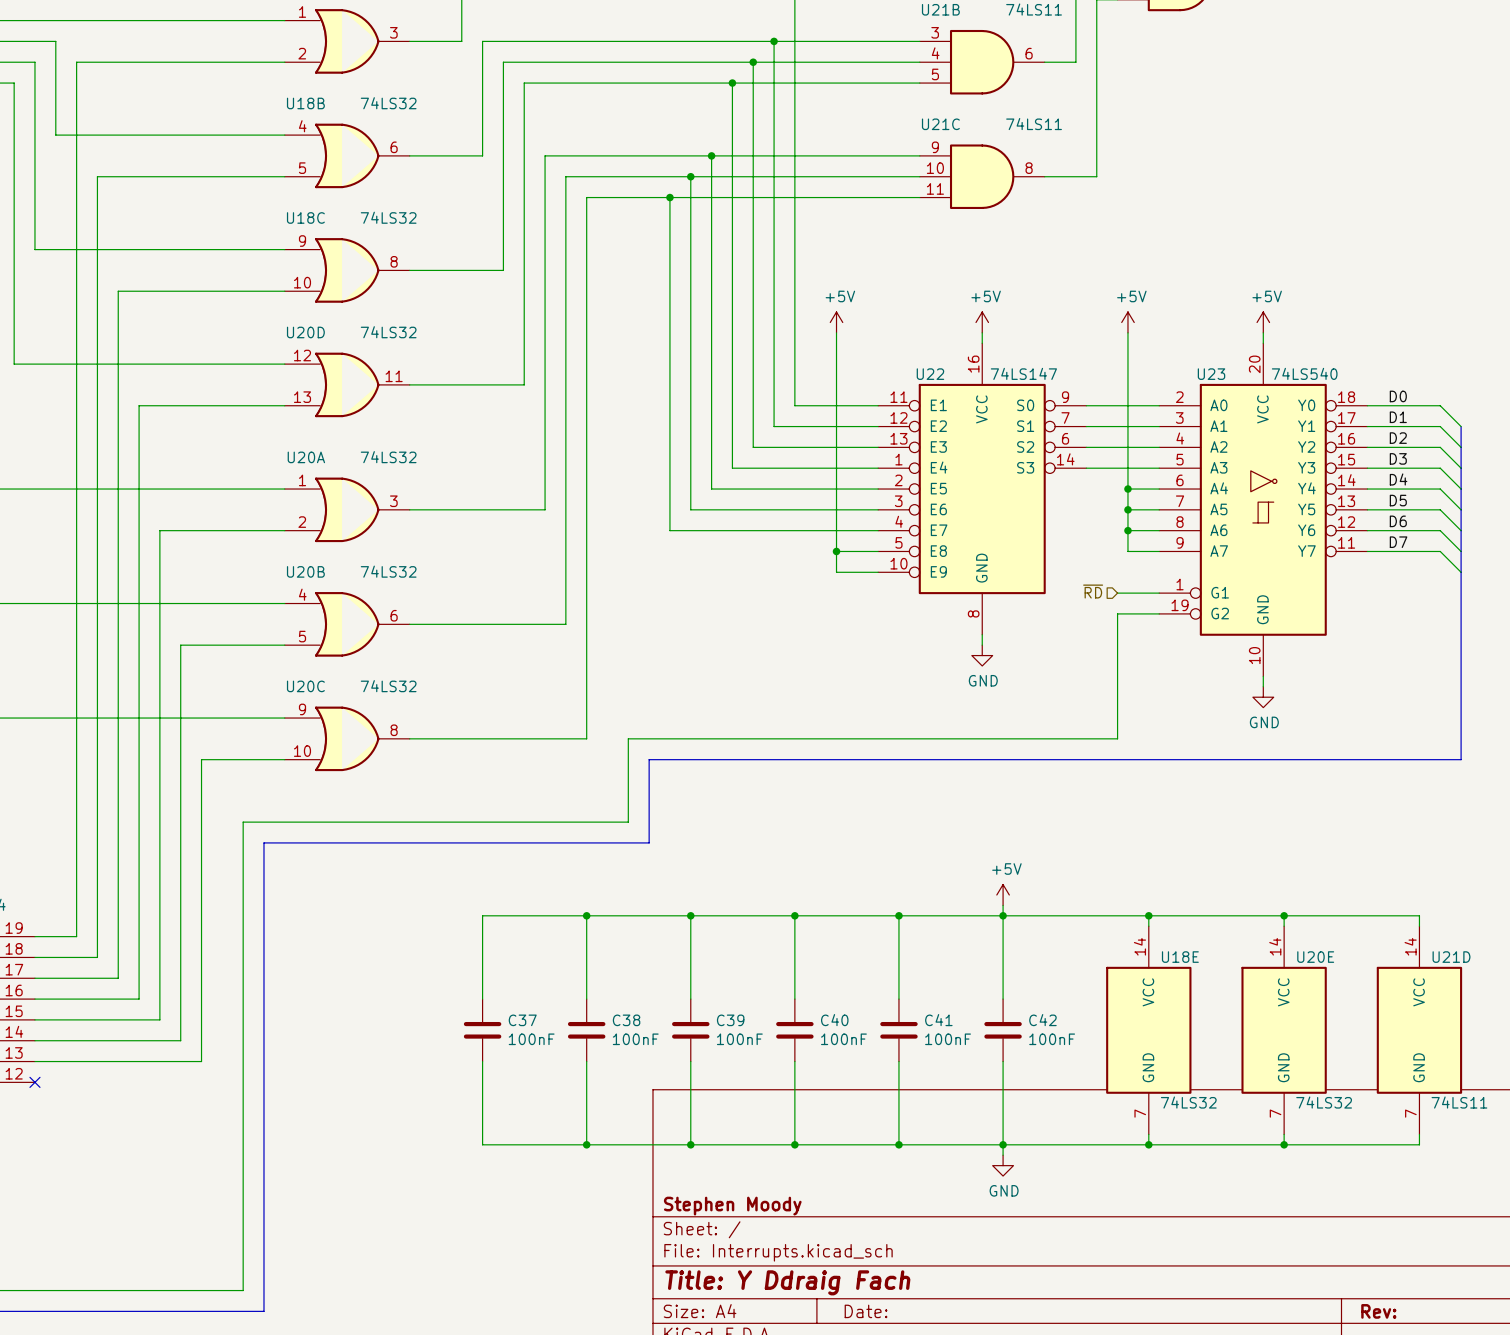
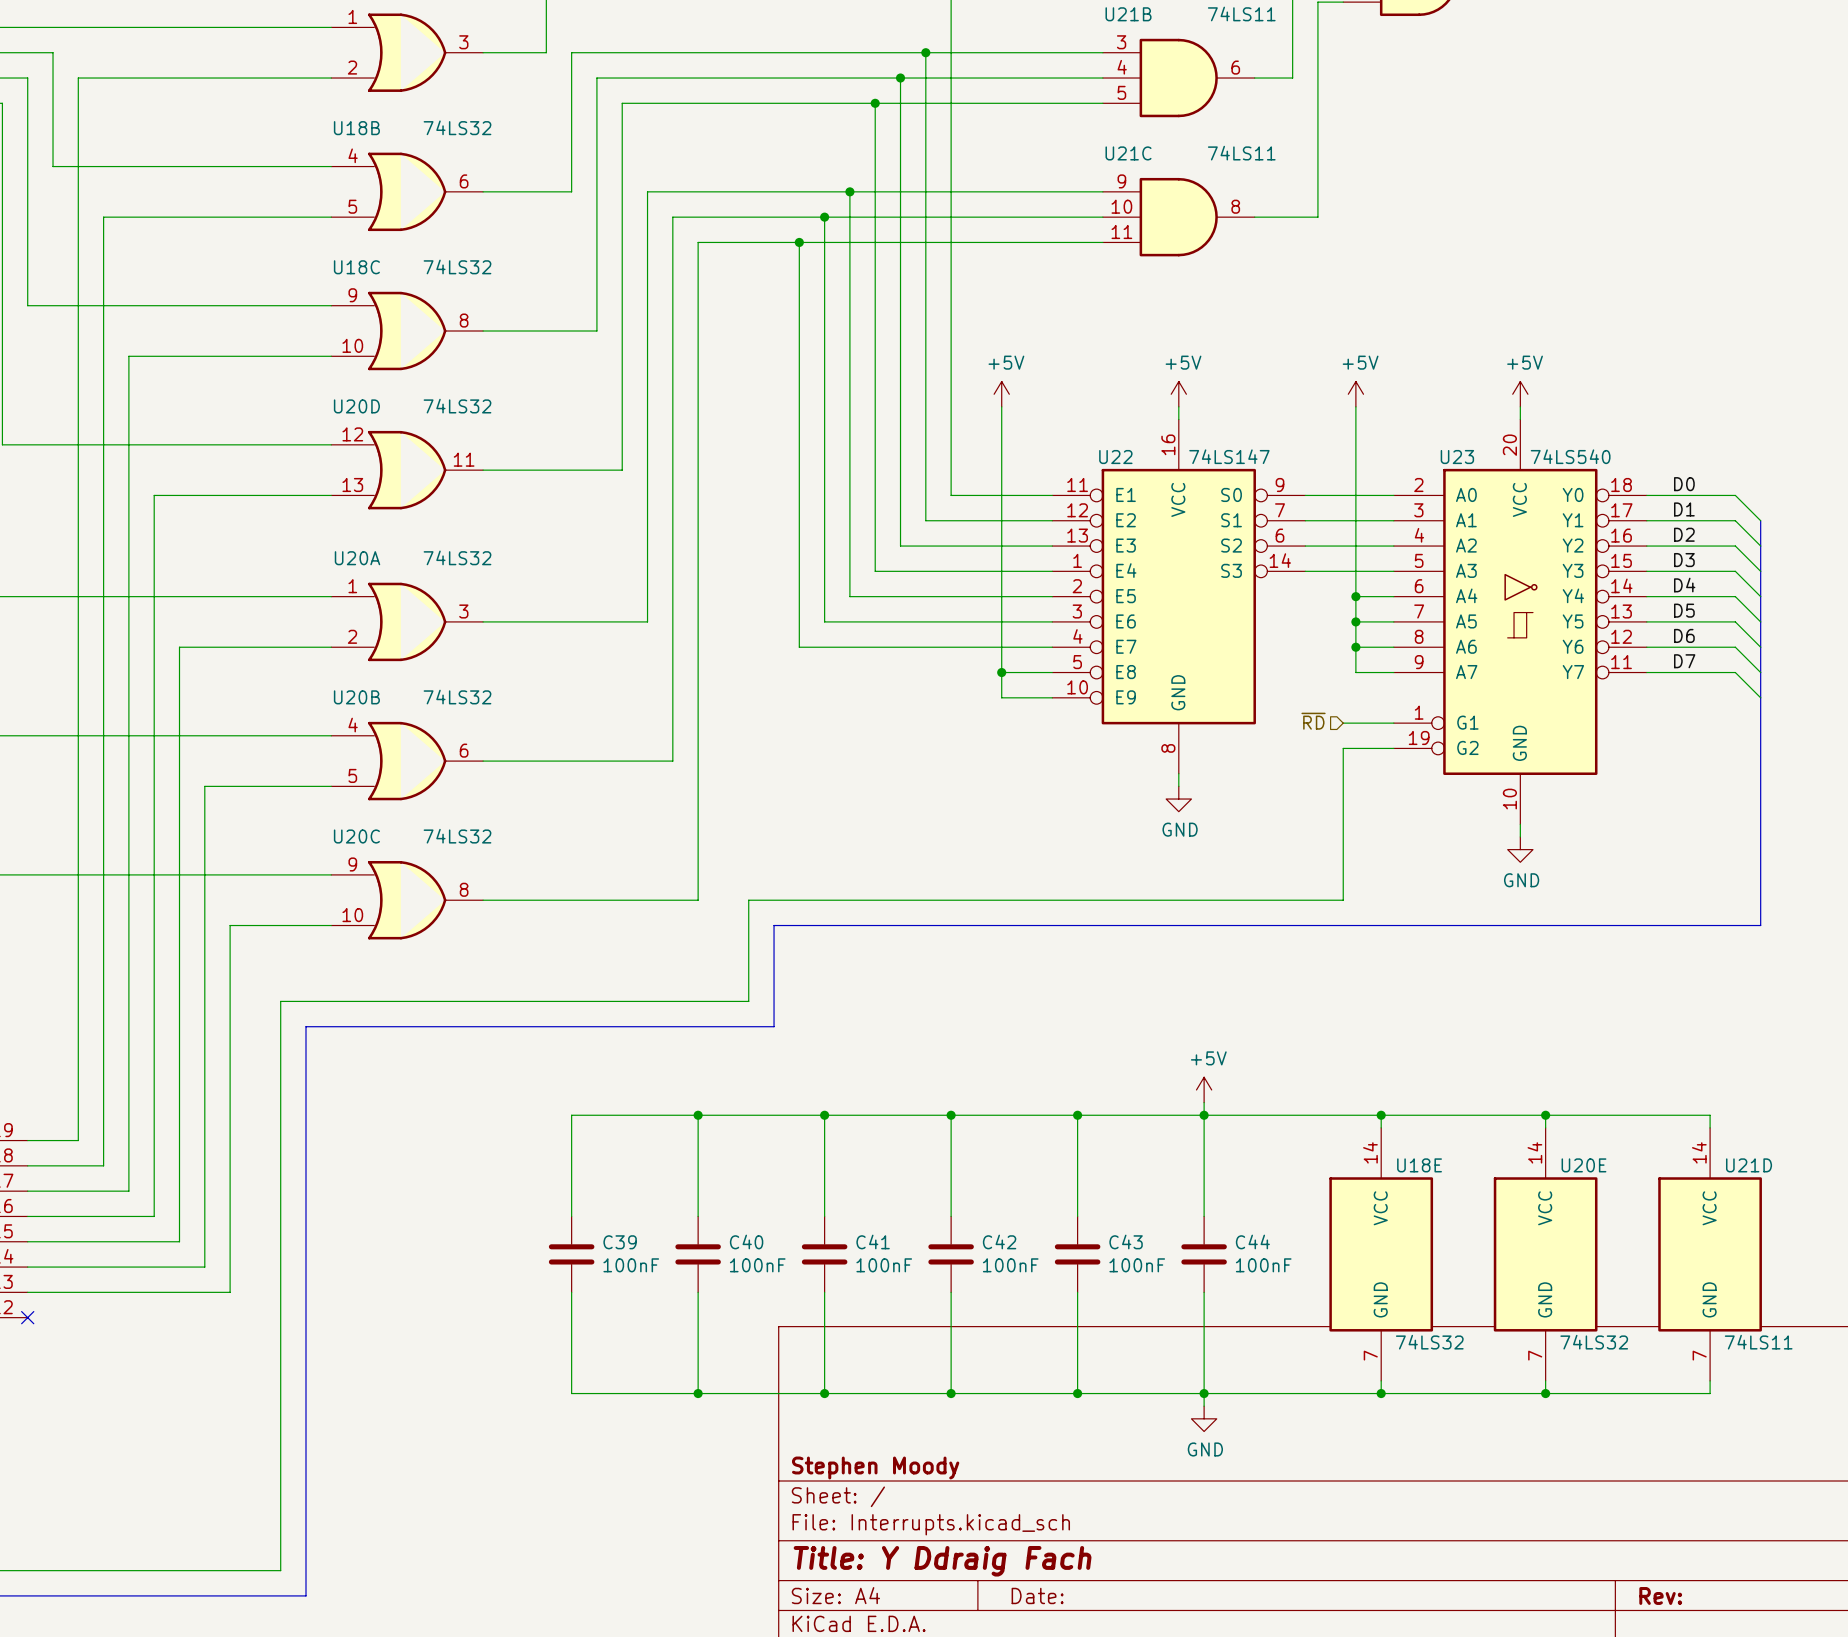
C37 name: C37 (522, 1020) -> C39 (620, 1242)
C38 name: C38 (626, 1020) -> C40 (746, 1241)
C39 name: C39 (730, 1020) -> C41 (873, 1241)
C40 name: C40 (834, 1020) -> C42 (999, 1241)
C41 name: C41 (938, 1020) -> C43 (1126, 1241)
C42 name: C42 (1042, 1020) -> C44 (1252, 1241)

